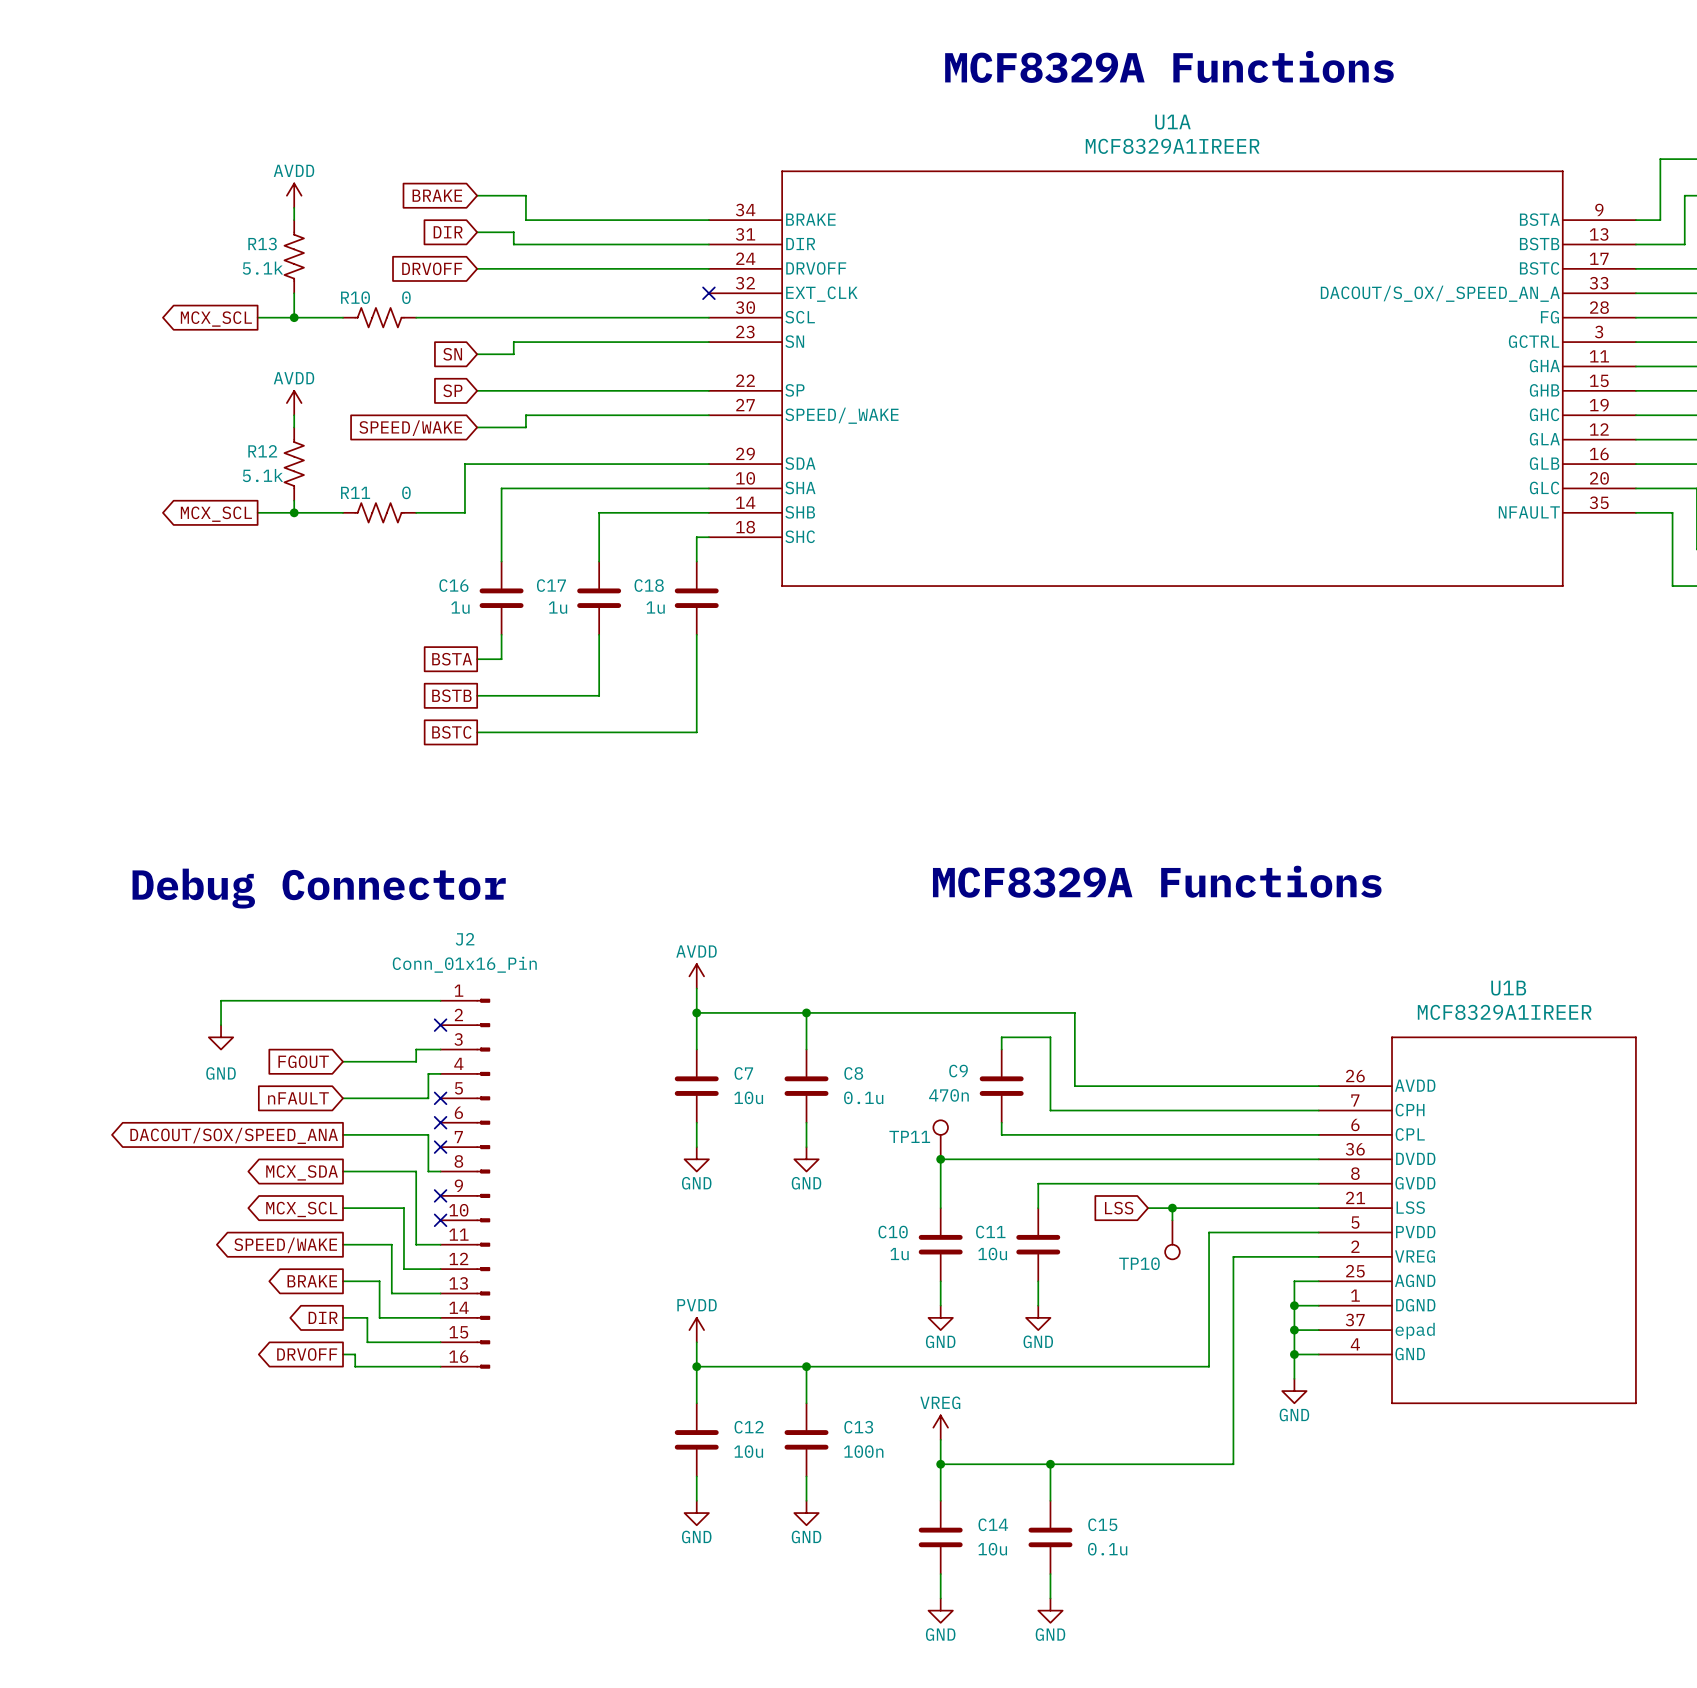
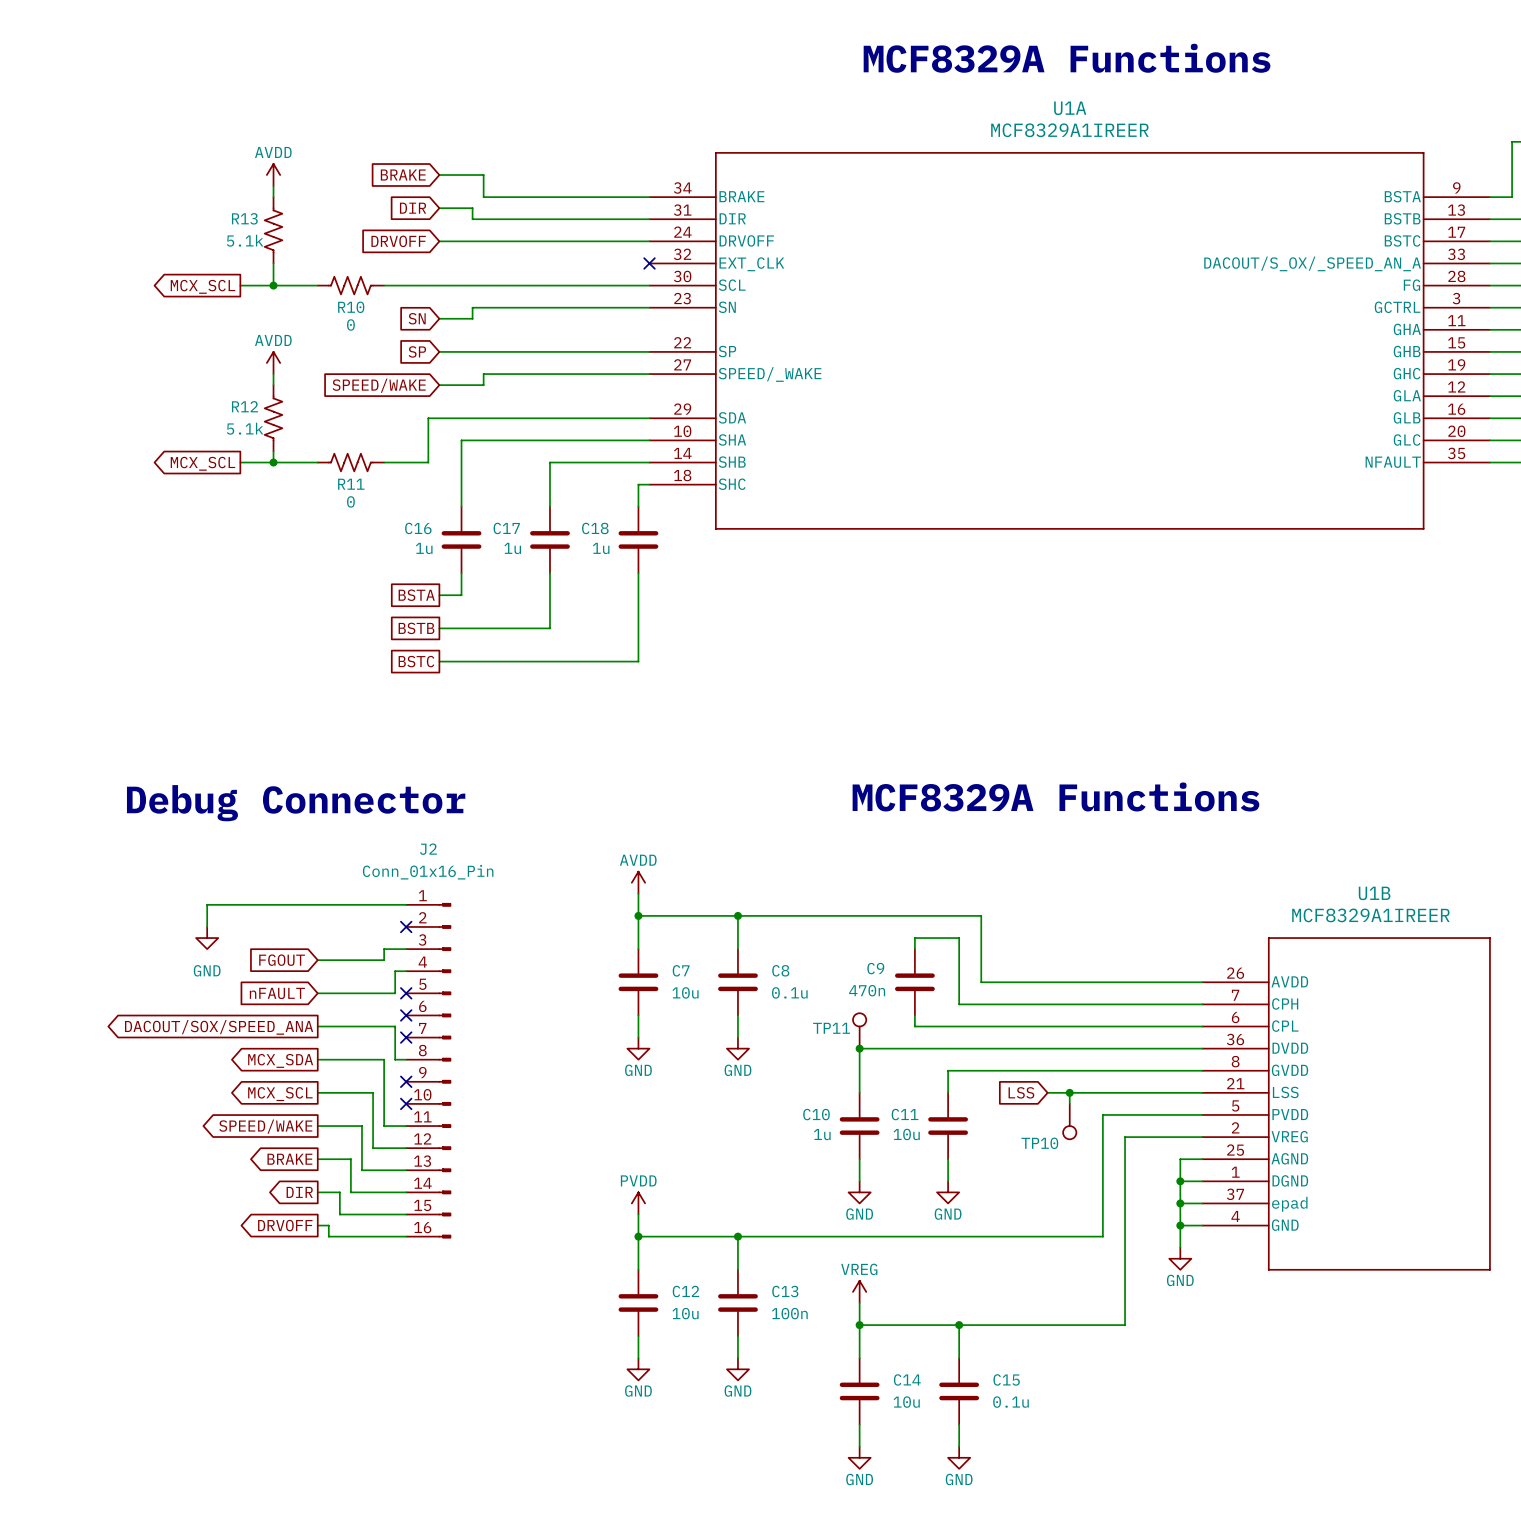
R10 name position: R10 (355, 297) -> R10 (351, 307)
R10 value position: 0 (406, 297) -> 0 (350, 324)
R11 name position: R11 (355, 492) -> R11 (351, 484)
R11 value position: 0 (406, 492) -> 0 (350, 501)

